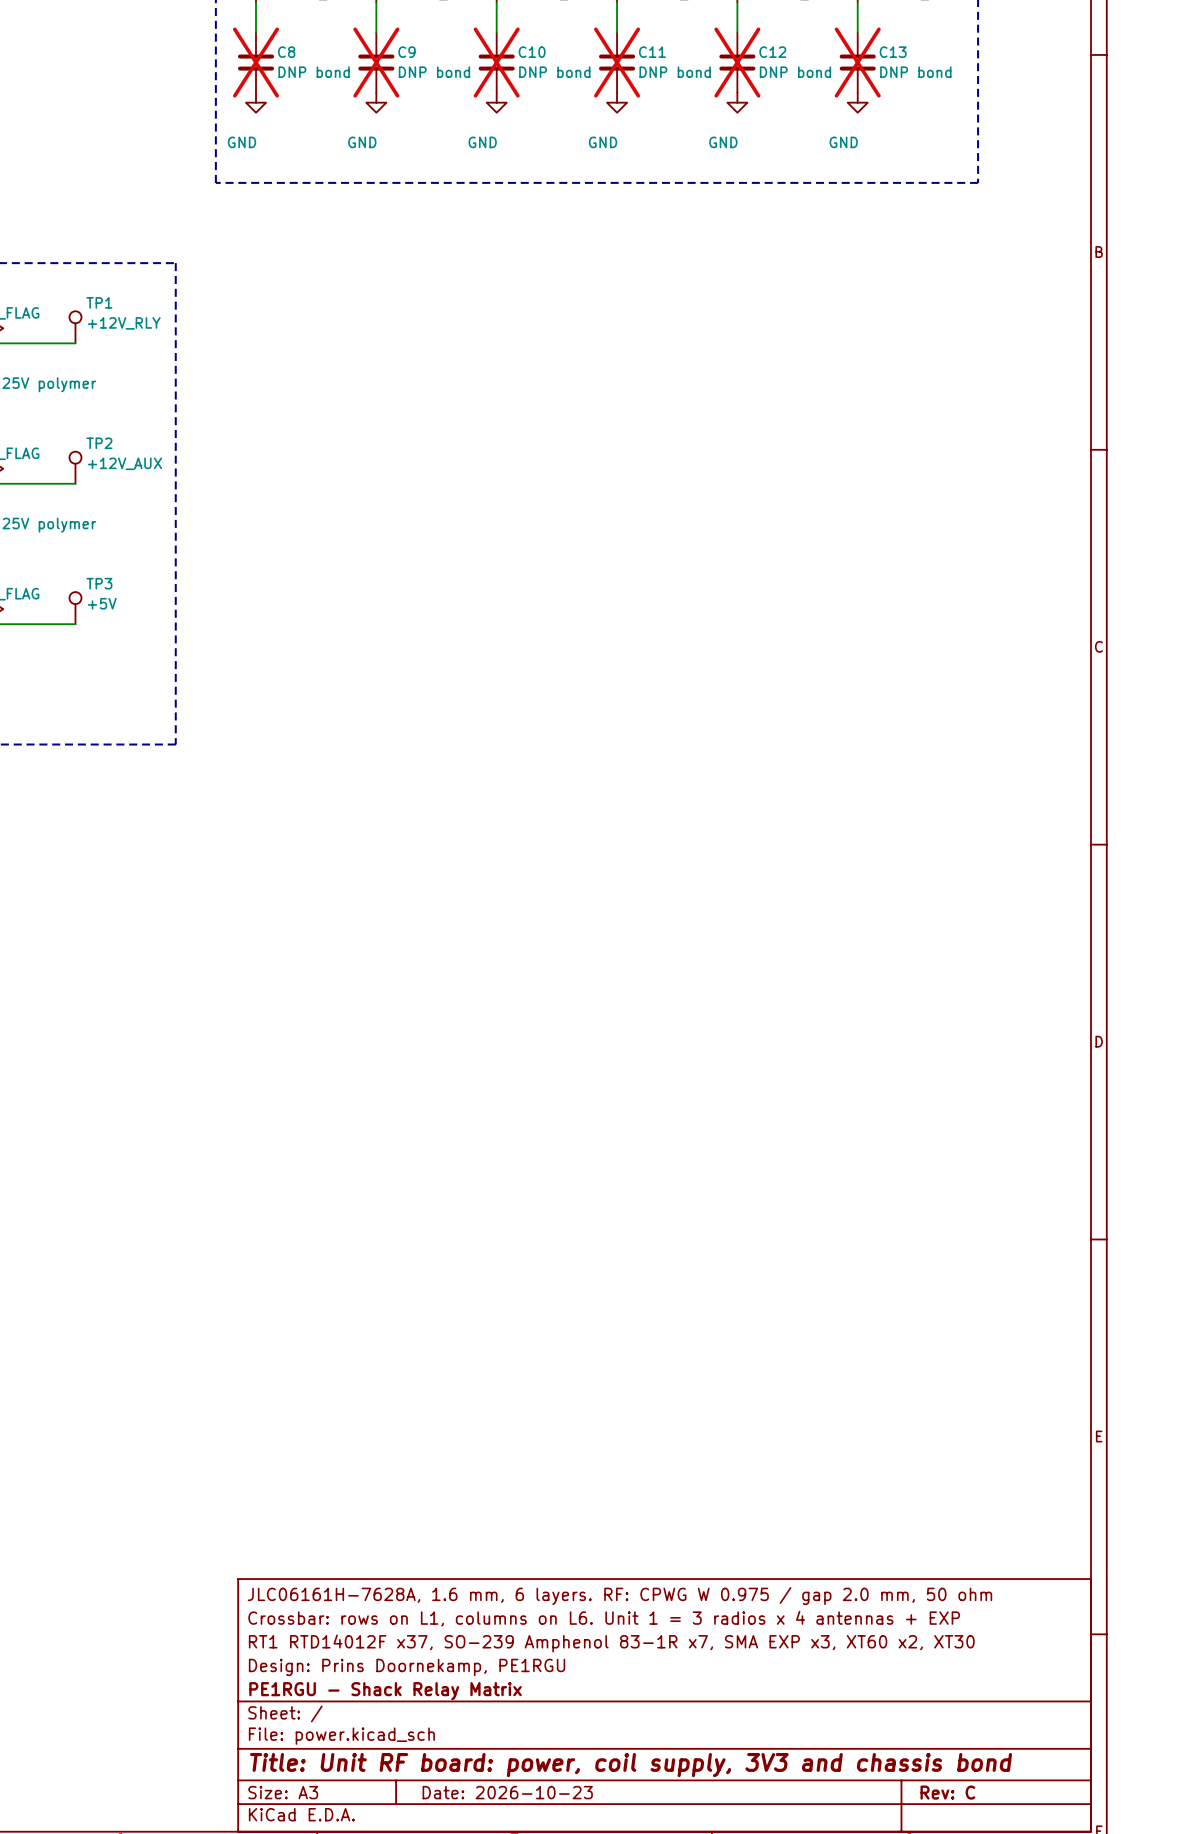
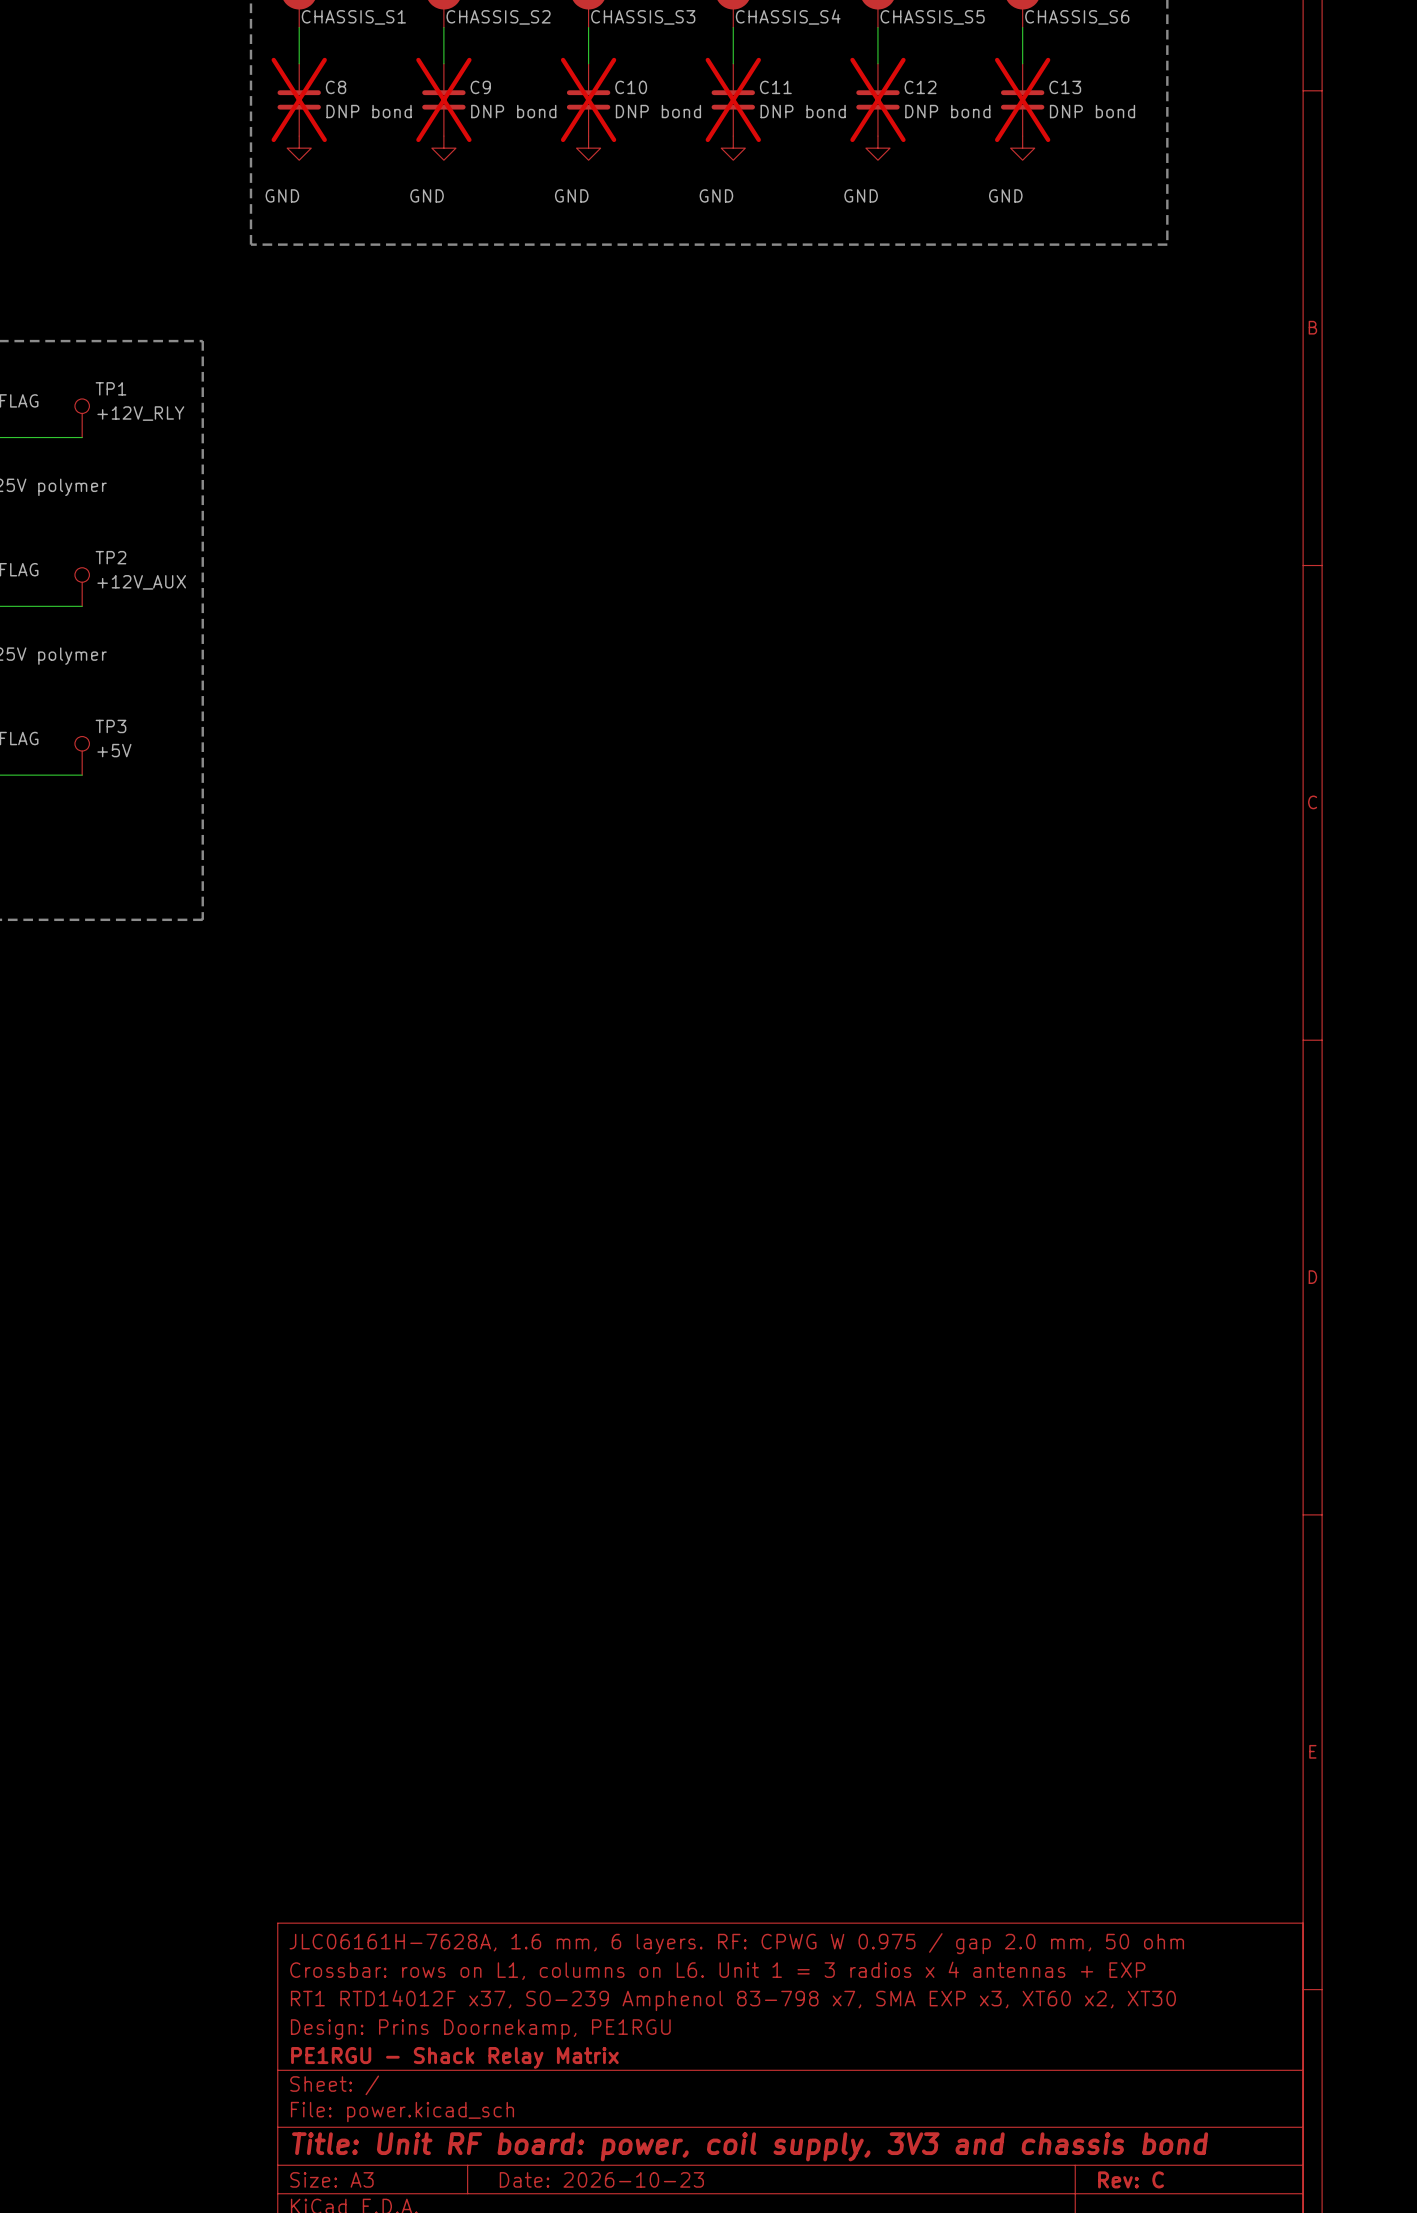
title block: RT1 RTD14012F x37, SO-239 Amphenol 83-1R x7, SMA EXP x3, XT60 x2, XT30 (611, 1643) -> RT1 RTD14012F x37, SO-239 Amphenol 83-798 x7, SMA EXP x3, XT60 x2, XT30 (733, 2000)

